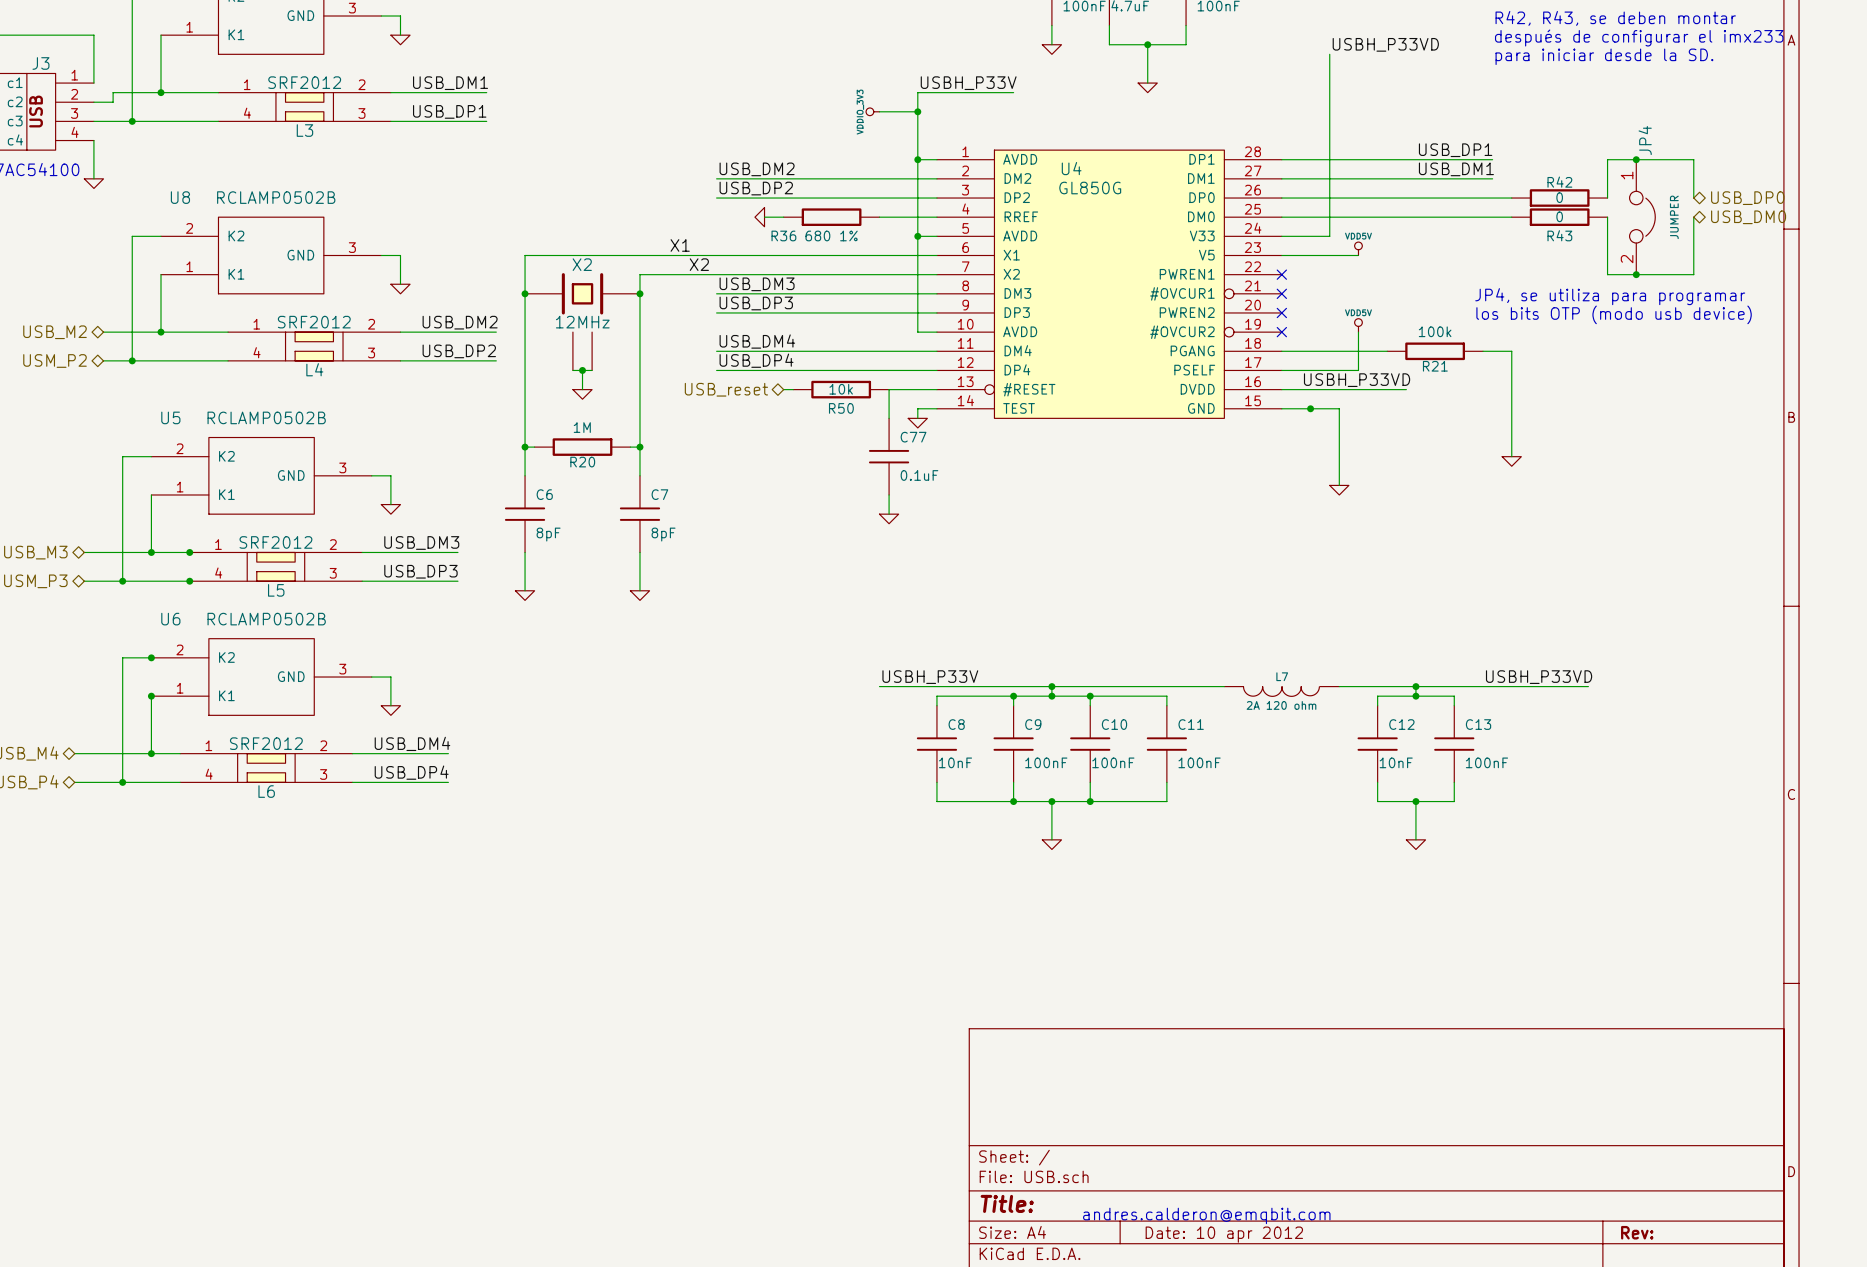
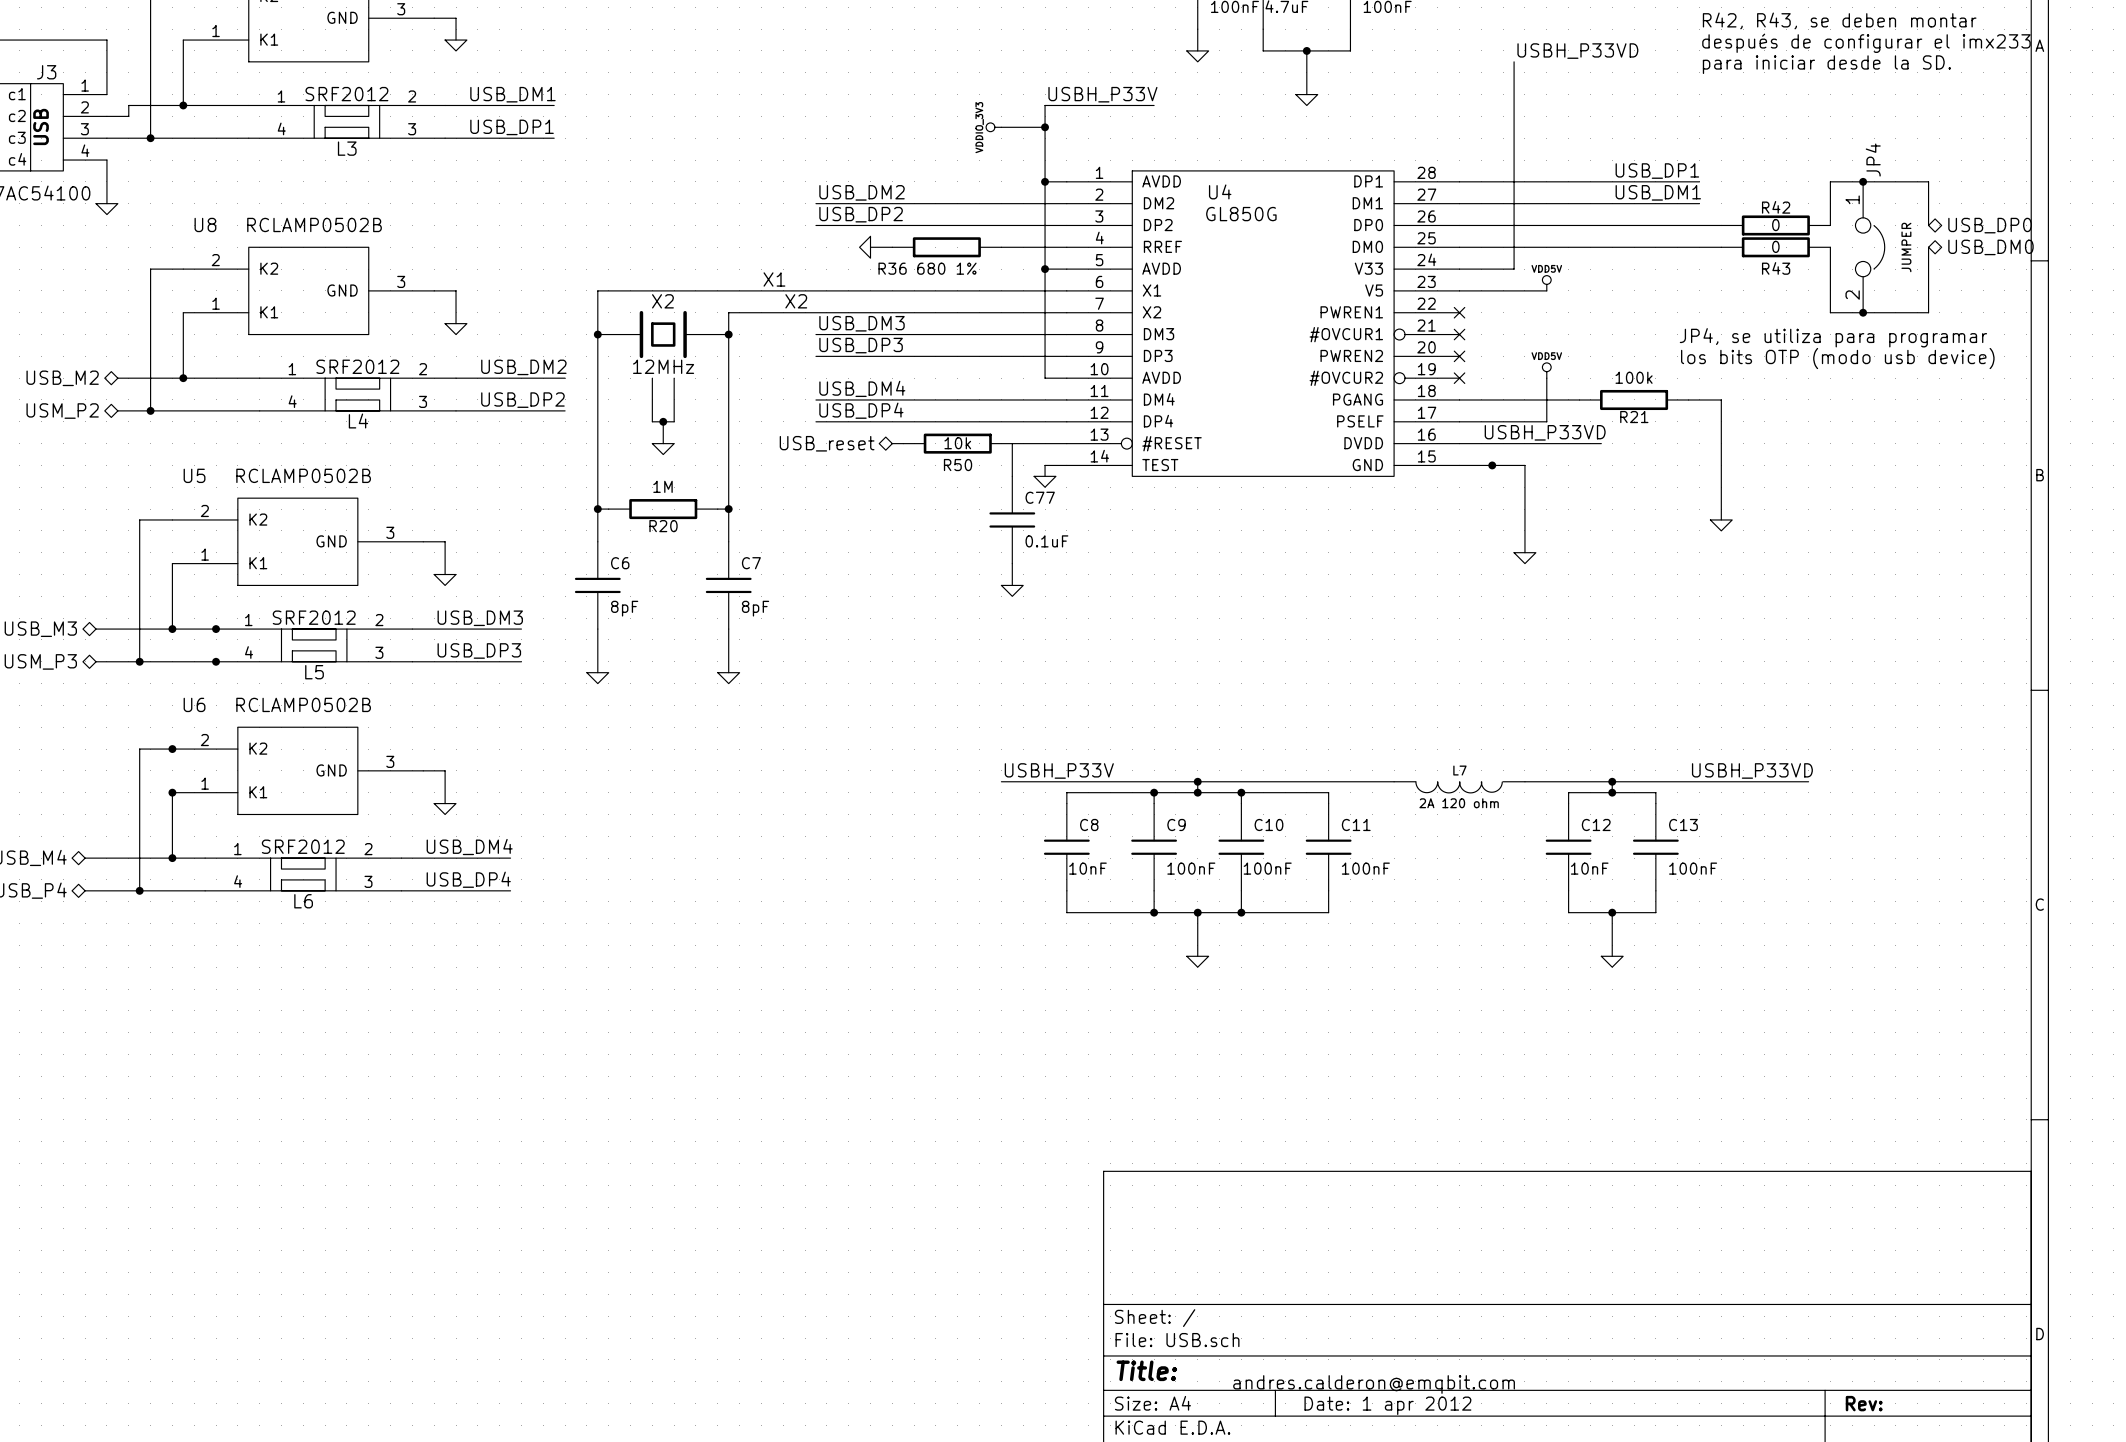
title block: Date: 10 apr 2012 (1224, 1234) -> Date: 1 apr 2012 (1387, 1405)

